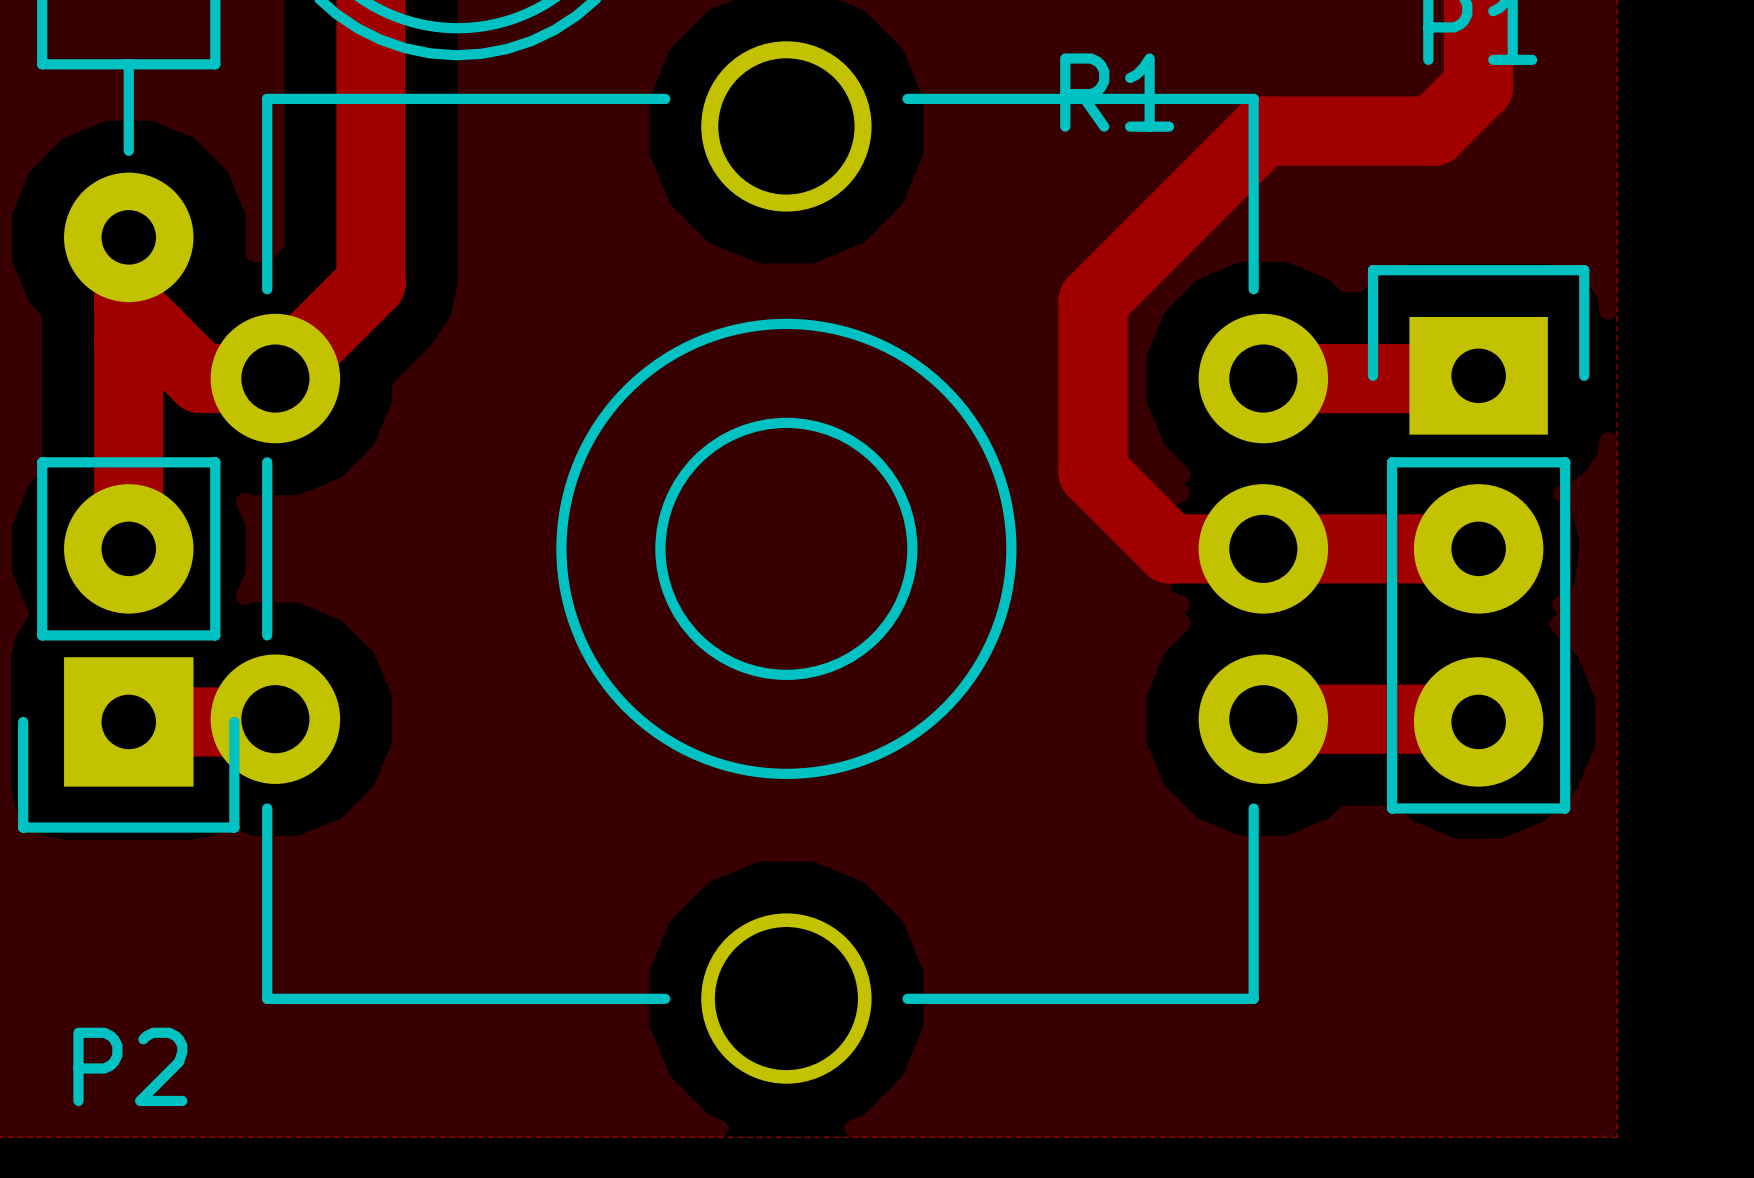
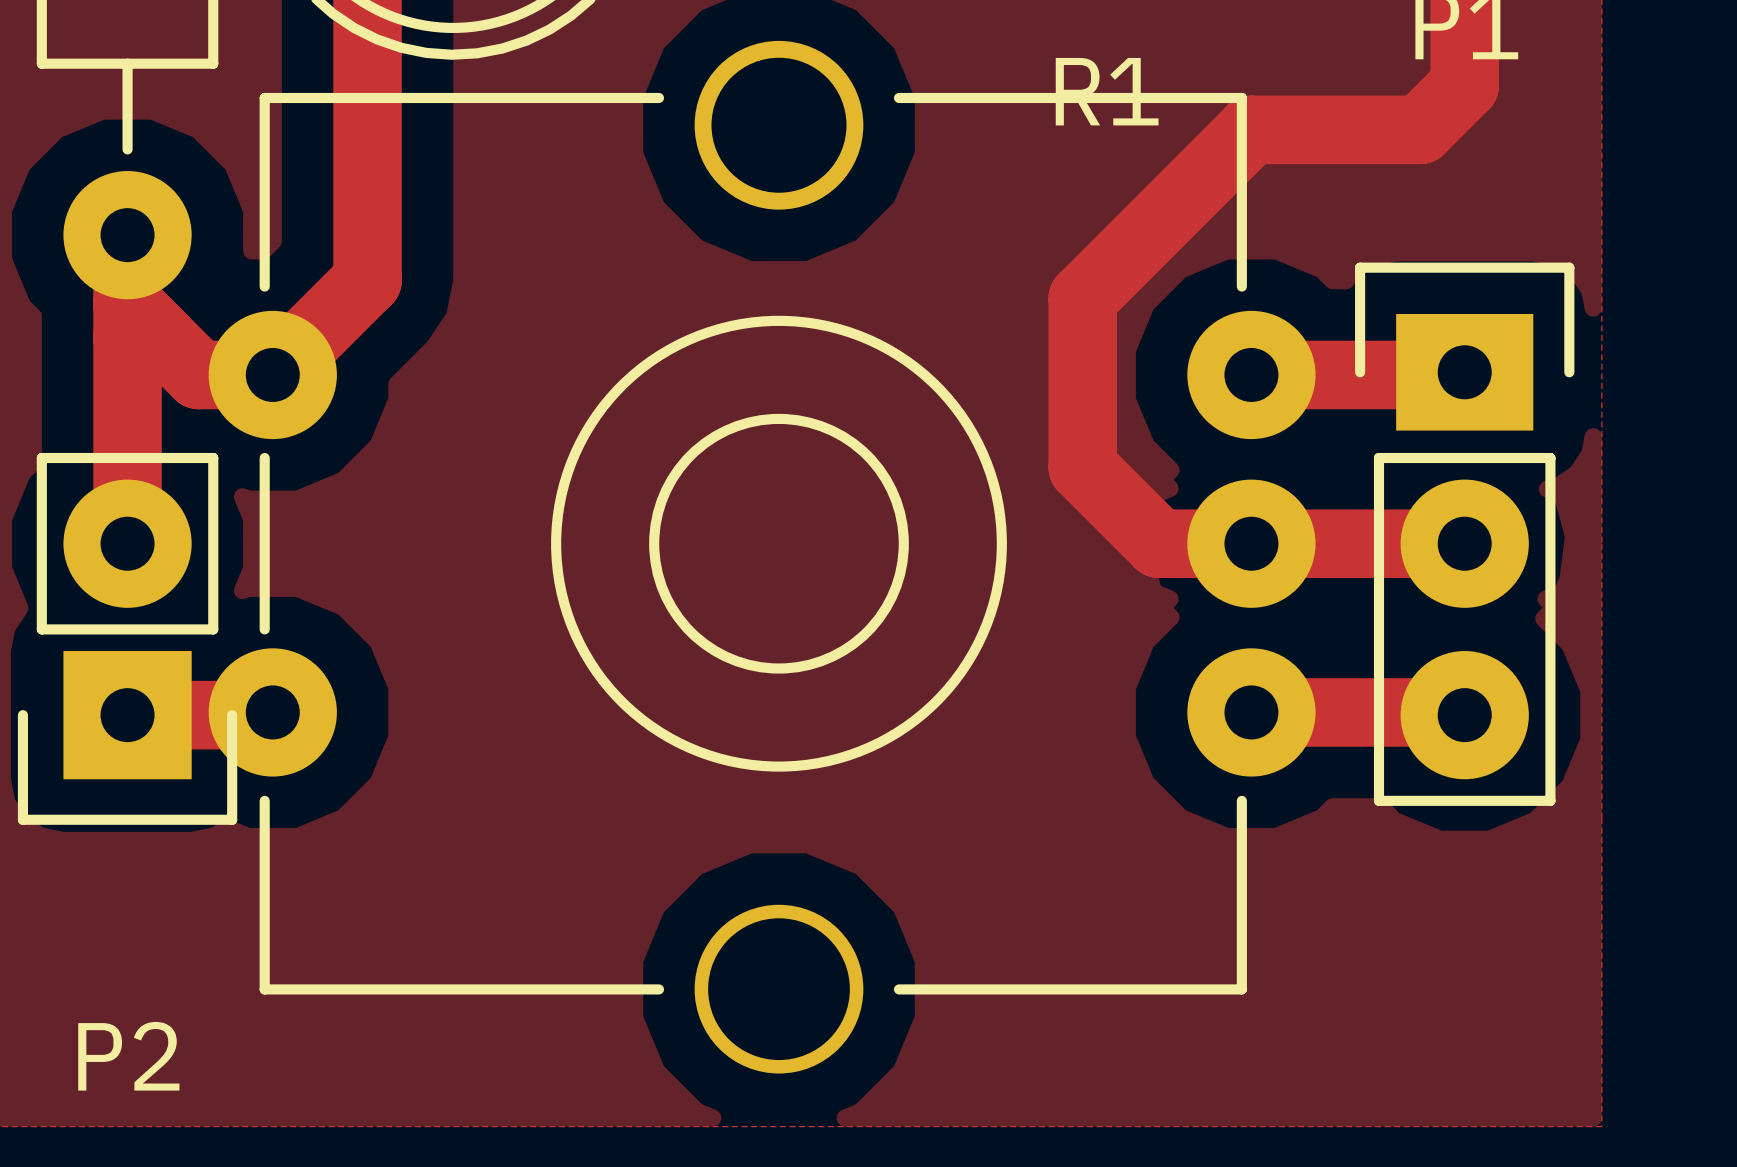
part footprint: [210, 41, 1329, 1084] -> [208, 40, 1316, 1074]

